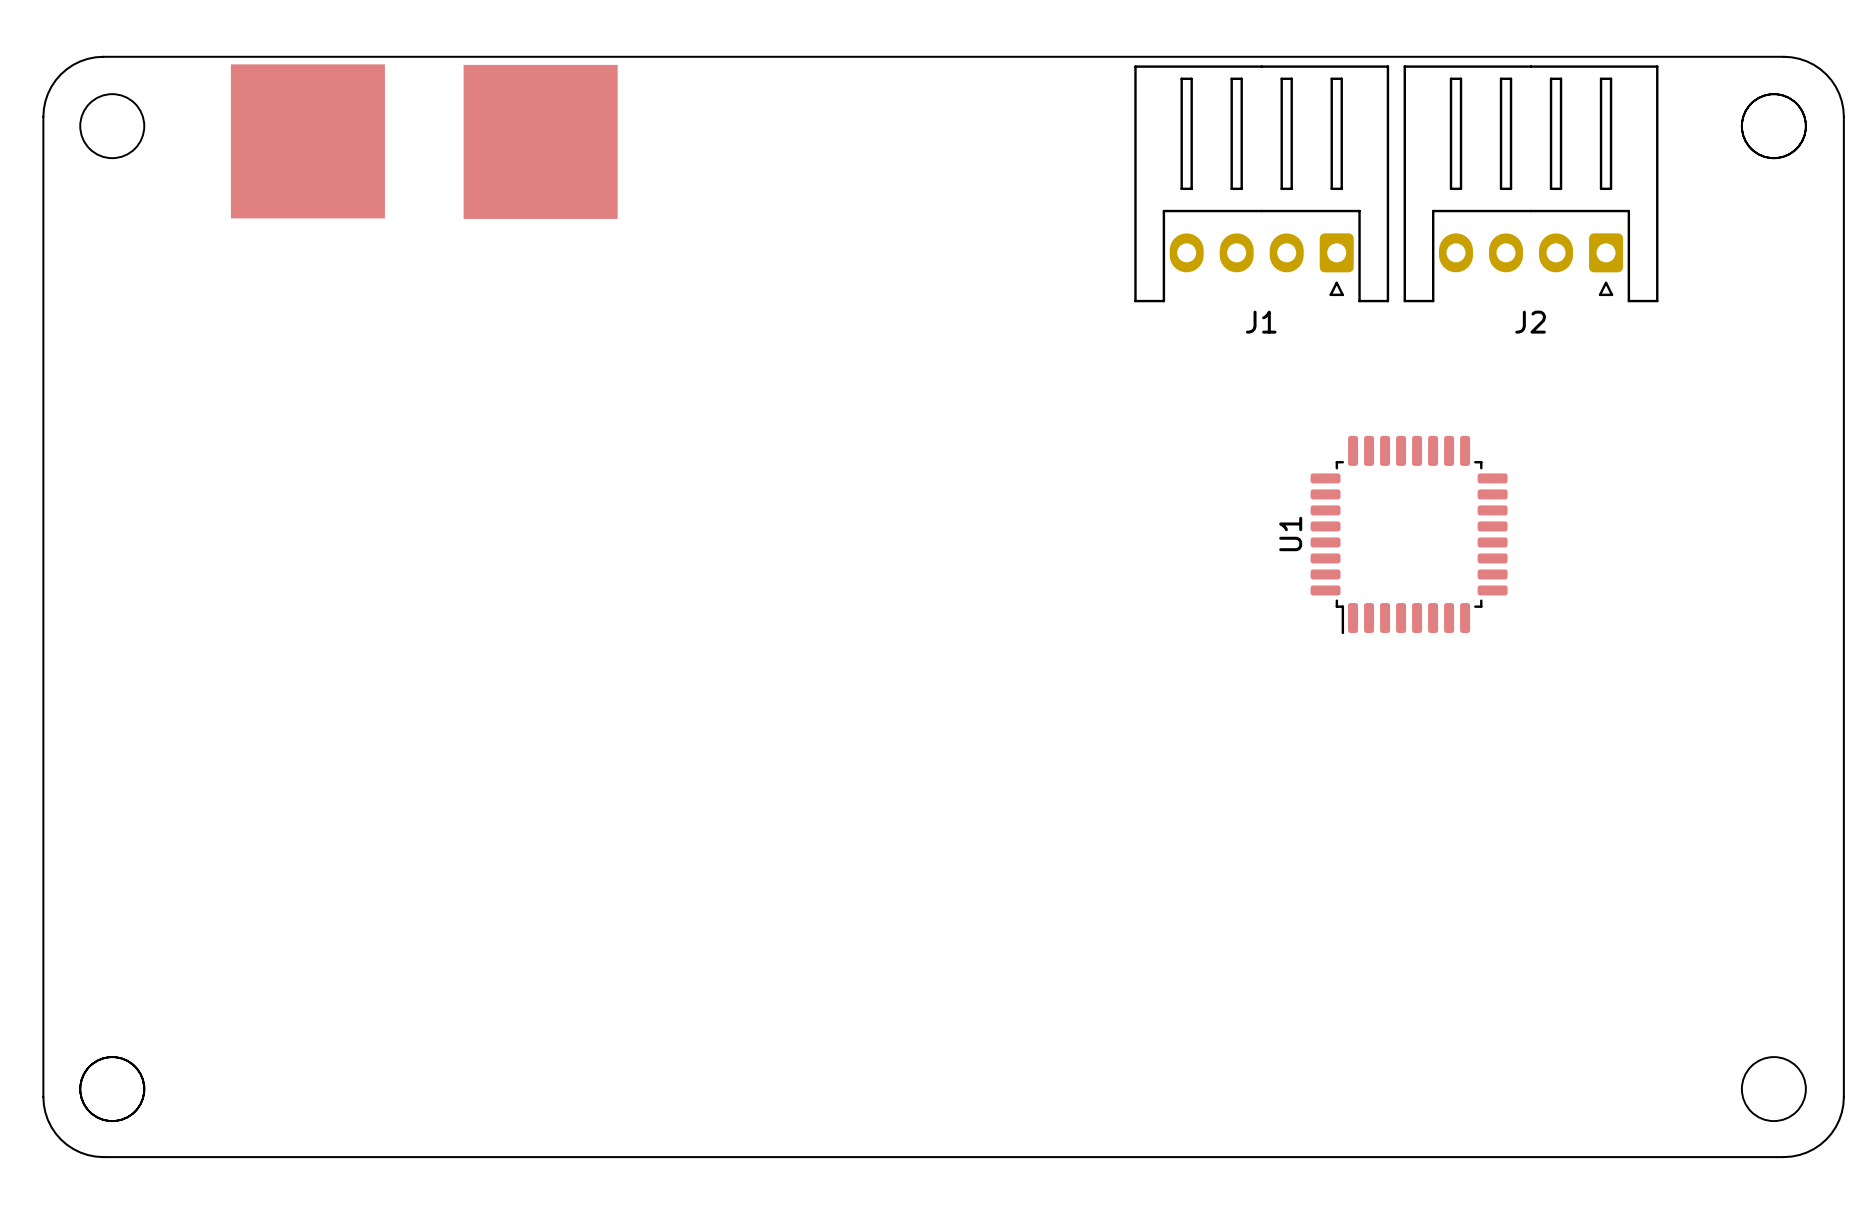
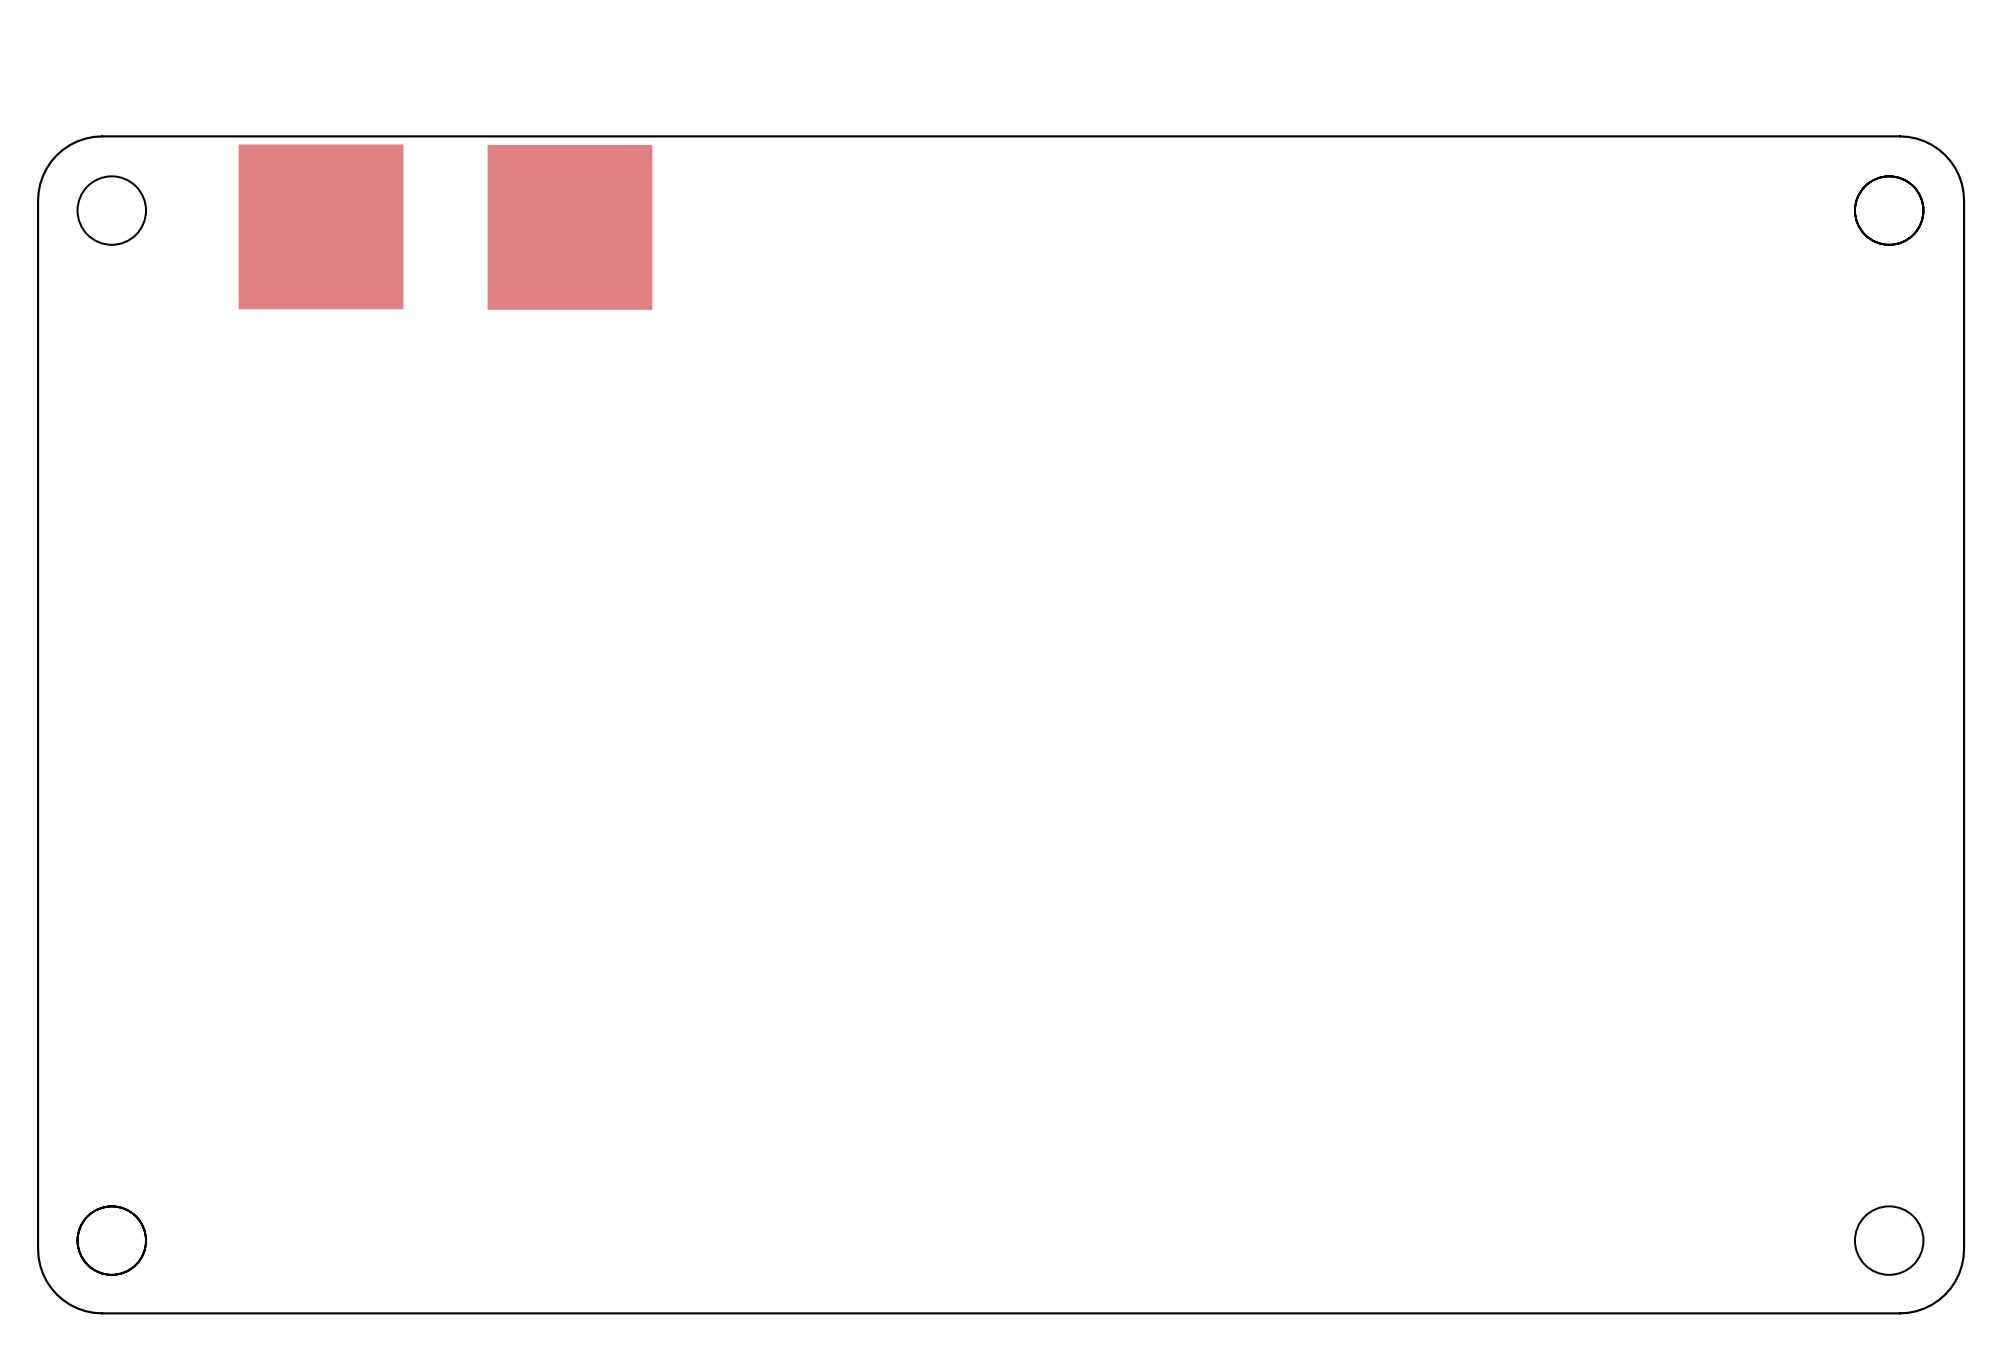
J1: (1261, 183) -> none
J2: (1531, 183) -> none
U1: (1409, 535) -> none

